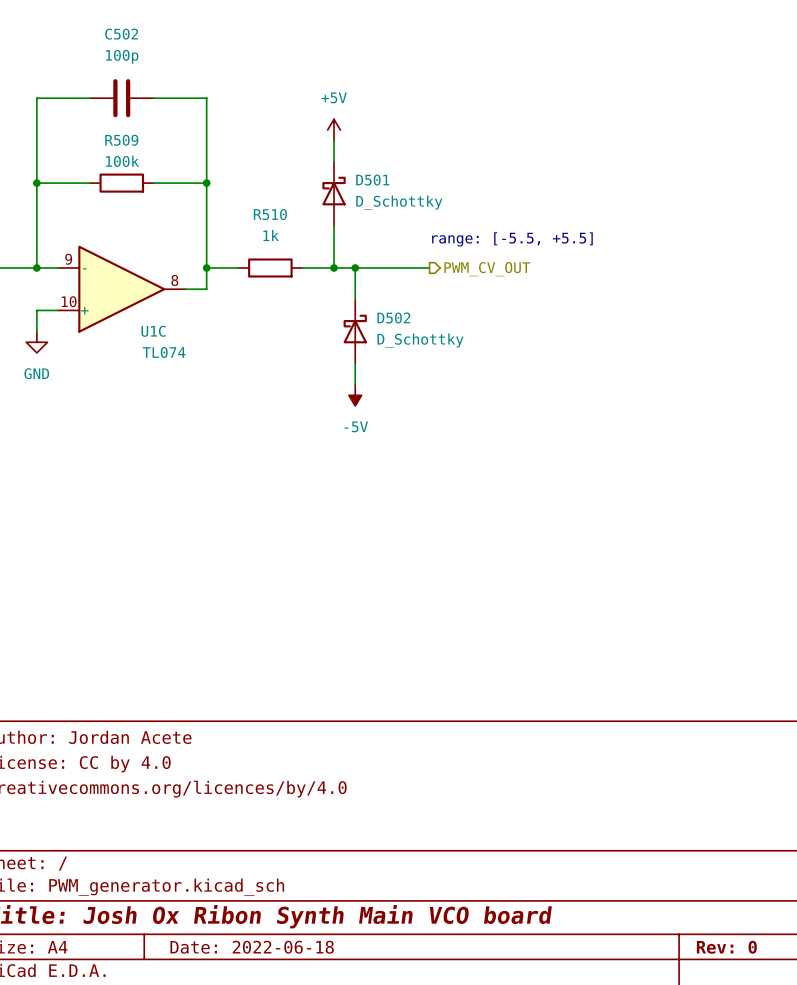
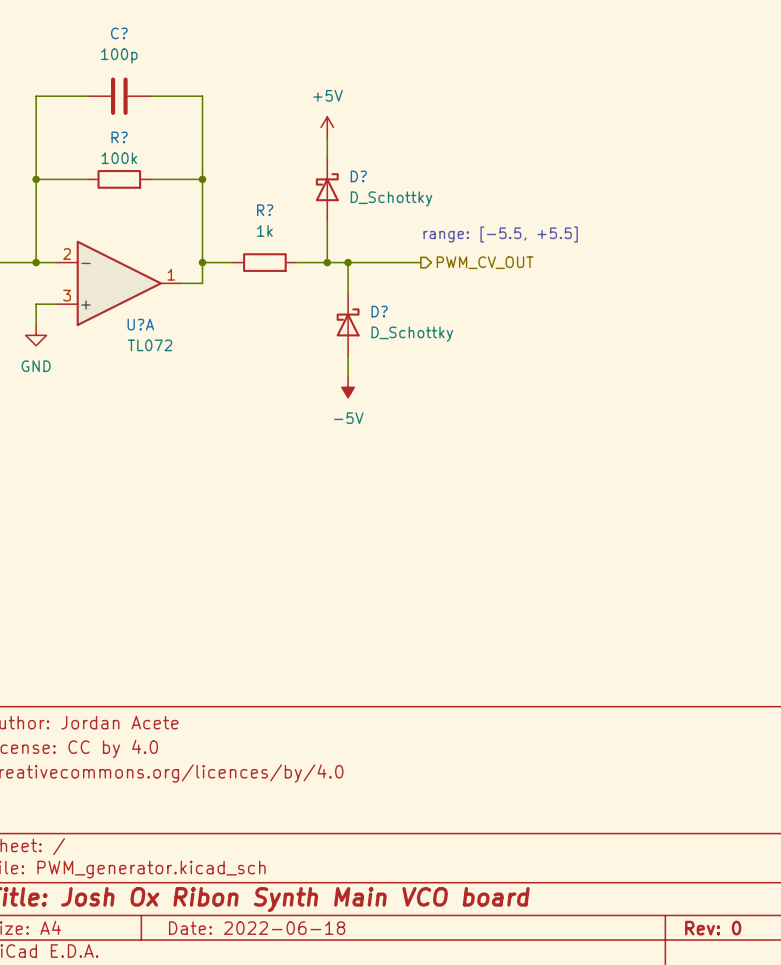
C502 name: C502 (121, 34) -> C? (119, 33)
R509 name: R509 (121, 140) -> R? (119, 137)
D501 name: D501 (372, 180) -> D? (358, 176)
R510 name: R510 (270, 214) -> R? (265, 210)
U1C pin number: 9 (68, 259) -> 2 (67, 254)
U1C pin number: 8 (174, 280) -> 1 (171, 274)
U1C pin number: 10 (69, 301) -> 3 (67, 295)
D502 name: D502 (393, 318) -> D? (379, 311)
U1C name: U1C (153, 331) -> U?A (140, 324)
U1C value: TL074 (164, 352) -> TL072 (150, 345)

